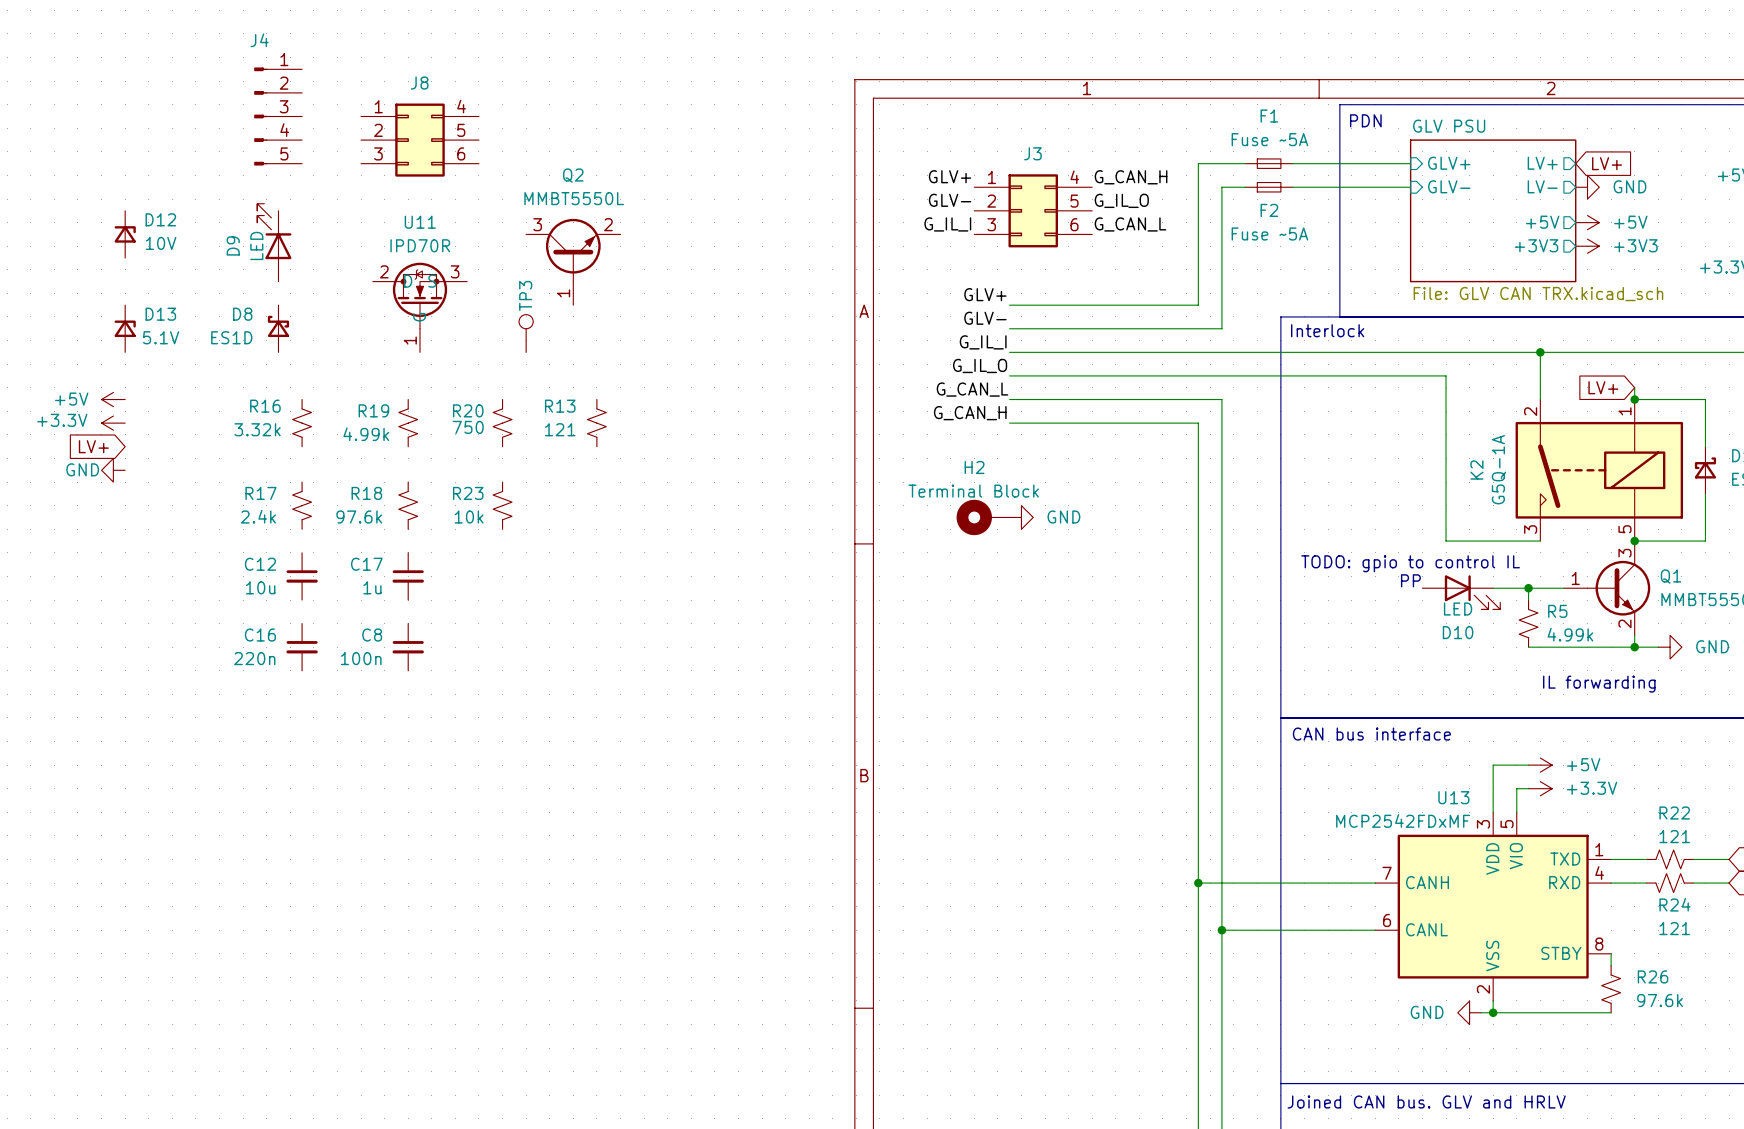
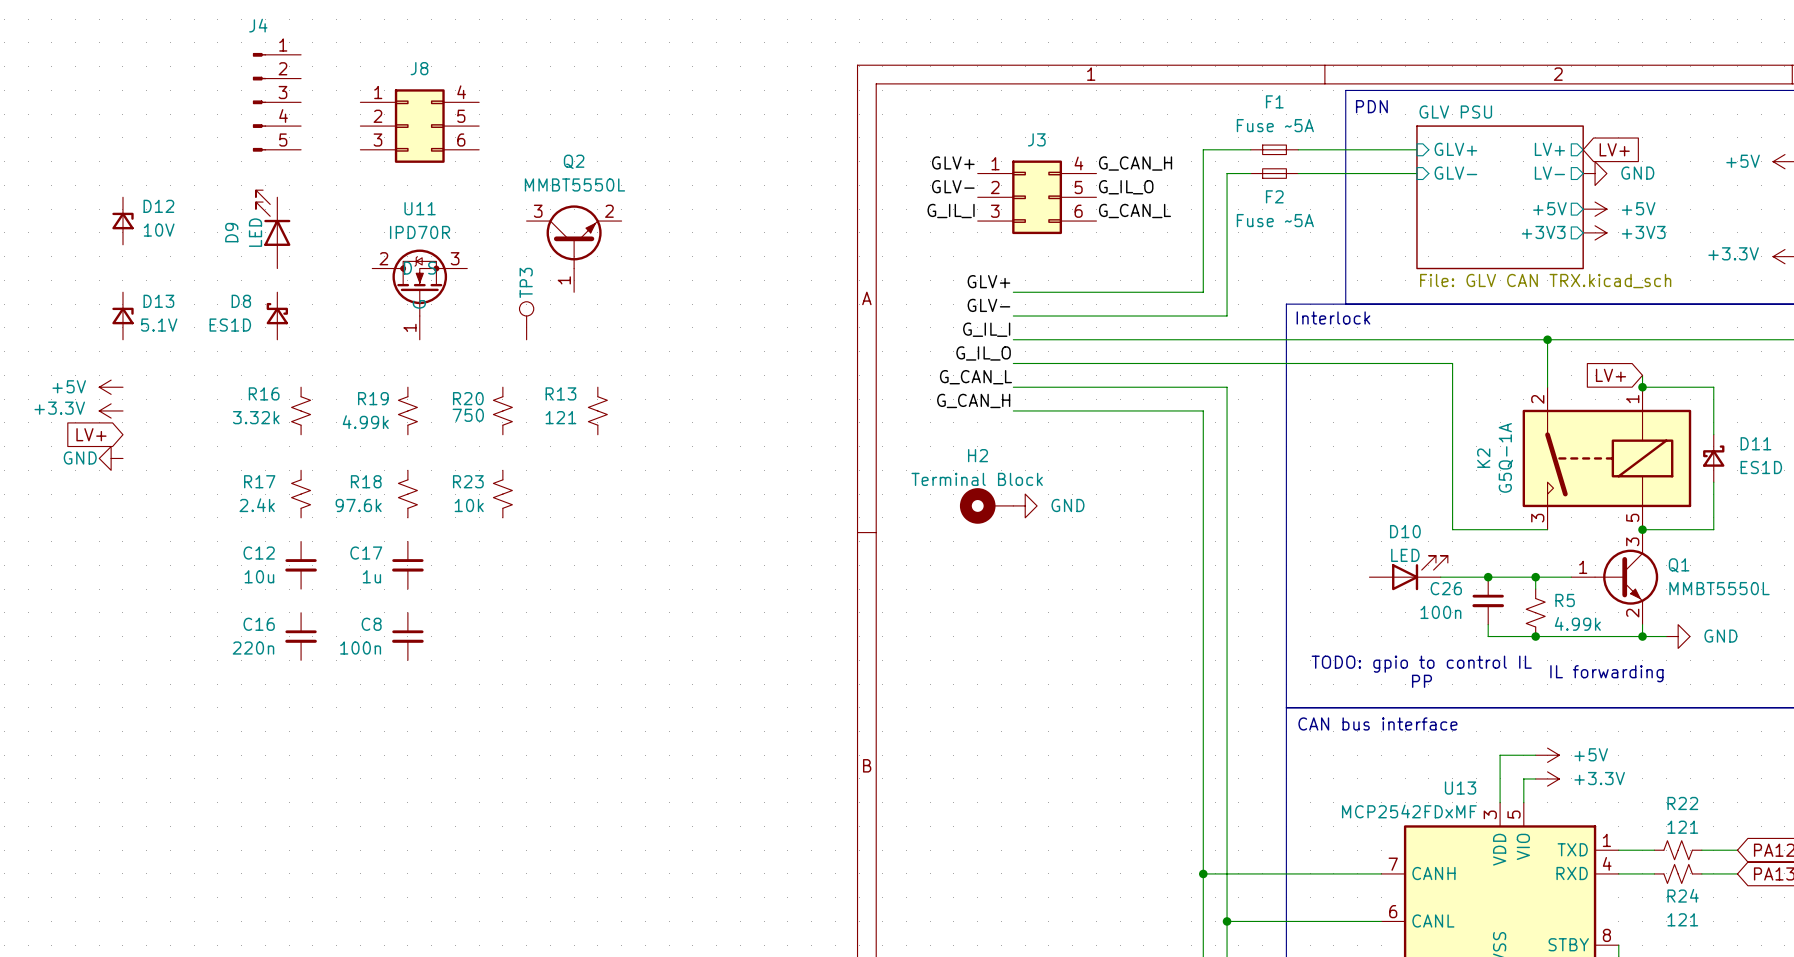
text position: TODO: gpio to control IL (1410, 563) -> TODO: gpio to control IL (1421, 664)
text position: PP (1410, 580) -> PP (1422, 681)
junction: none -> (1488, 577)
D10 position: (1461, 592) -> (1408, 573)
D10 flip: as is (1472, 592) -> up-down (1419, 573)
C26: none -> 100n (1488, 600)
wire: none -> (1488, 624) (1488, 636) (1535, 636)
junction: none -> (1535, 636)

